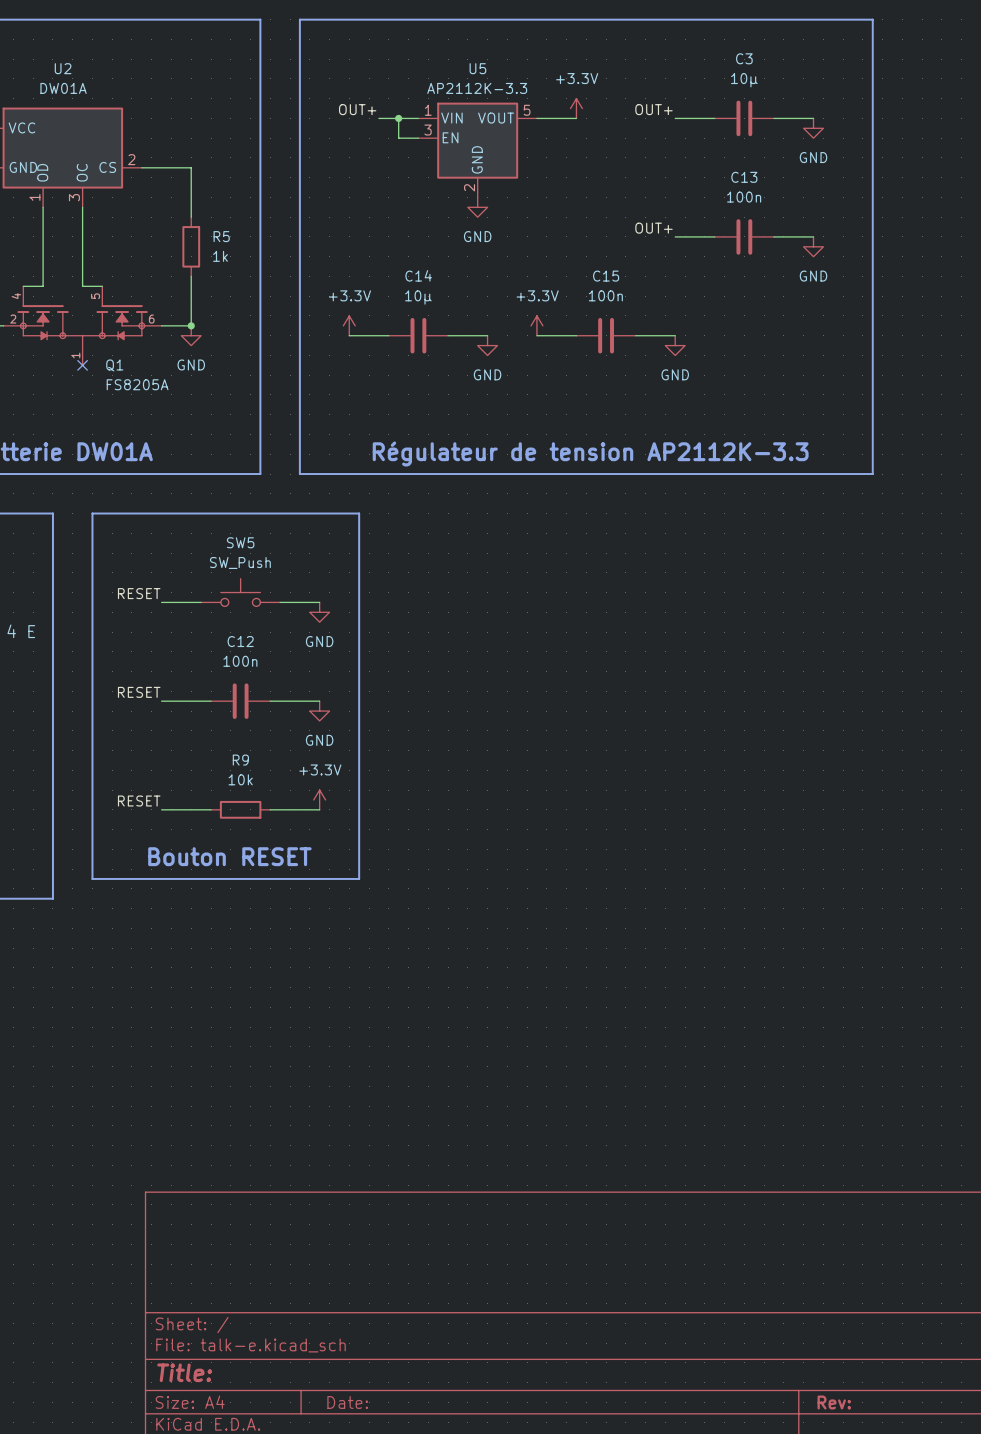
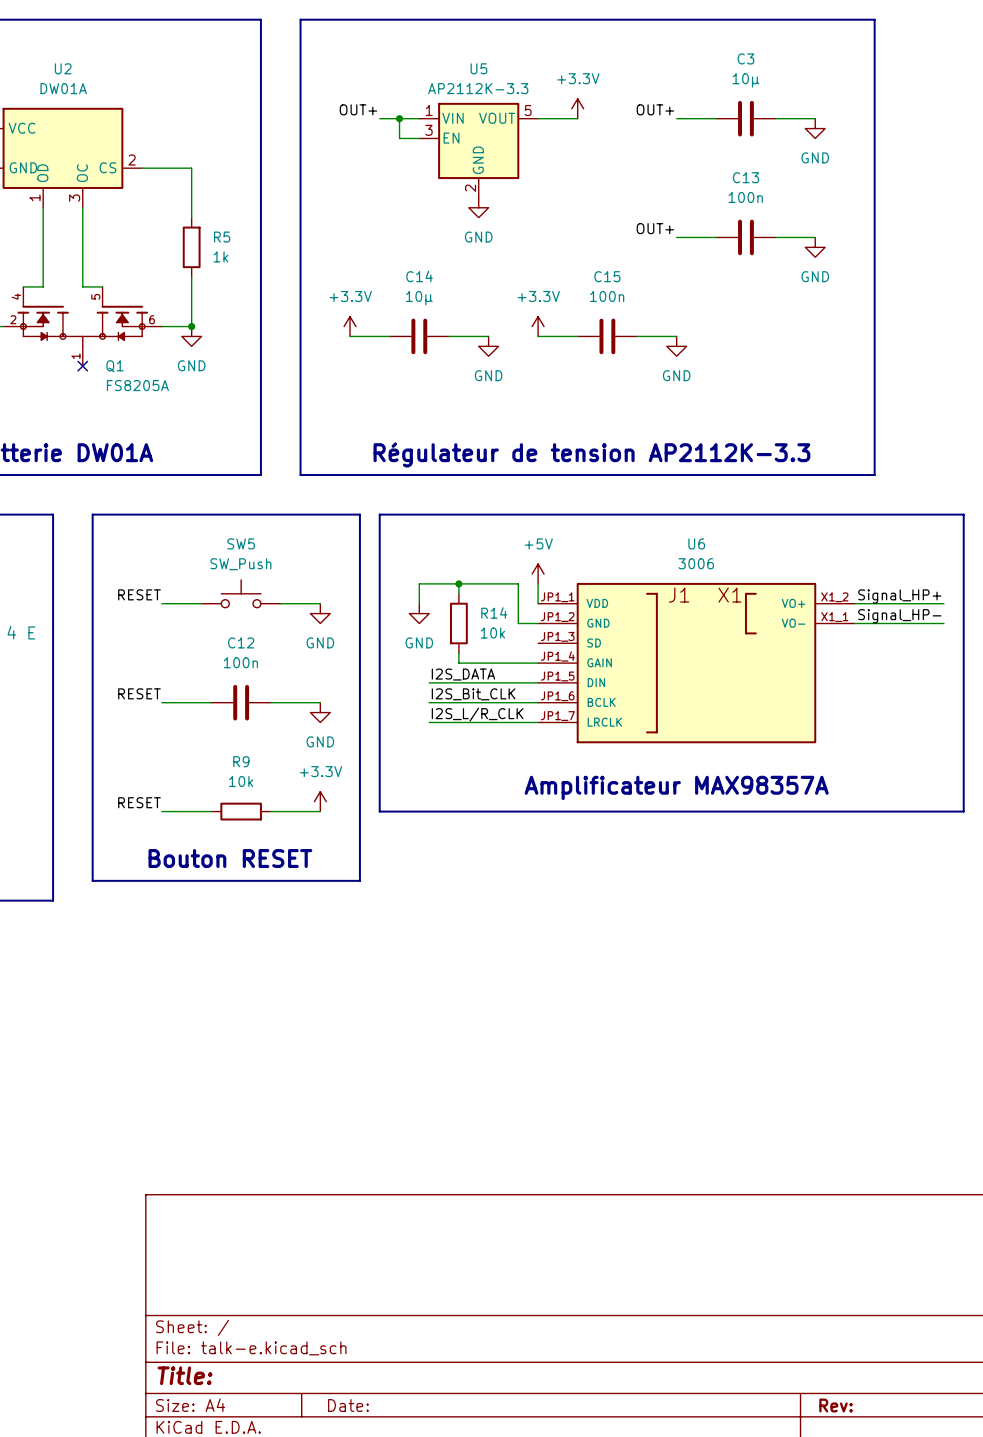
line: none -> (379, 514) (963, 514) (963, 811) (379, 811) (379, 514)
power symbol: none -> +5V (538, 574)
wire: none -> (458, 583) (458, 593)
junction: none -> (458, 583)
wire: none -> (538, 583) (538, 603)
label: none -> Signal_HP+ (899, 596)
wire: none -> (419, 603) (419, 583) (518, 583) (518, 623) (538, 623)
wire: none -> (854, 603) (943, 603)
power symbol: none -> GND (419, 613)
label: none -> Signal_HP- (899, 616)
R14: none -> 10k (458, 623)
wire: none -> (854, 623) (943, 623)
wire: none -> (458, 653) (458, 663) (538, 663)
U6: none -> 3006 (696, 663)
label: none -> I2S_DATA (463, 674)
wire: none -> (429, 682) (538, 682)
label: none -> I2S_Bit_CLK (473, 694)
wire: none -> (429, 702) (538, 702)
label: none -> I2S_L/R_CLK (477, 714)
wire: none -> (429, 722) (538, 722)
text: none -> Amplificateur MAX98357A (676, 787)

